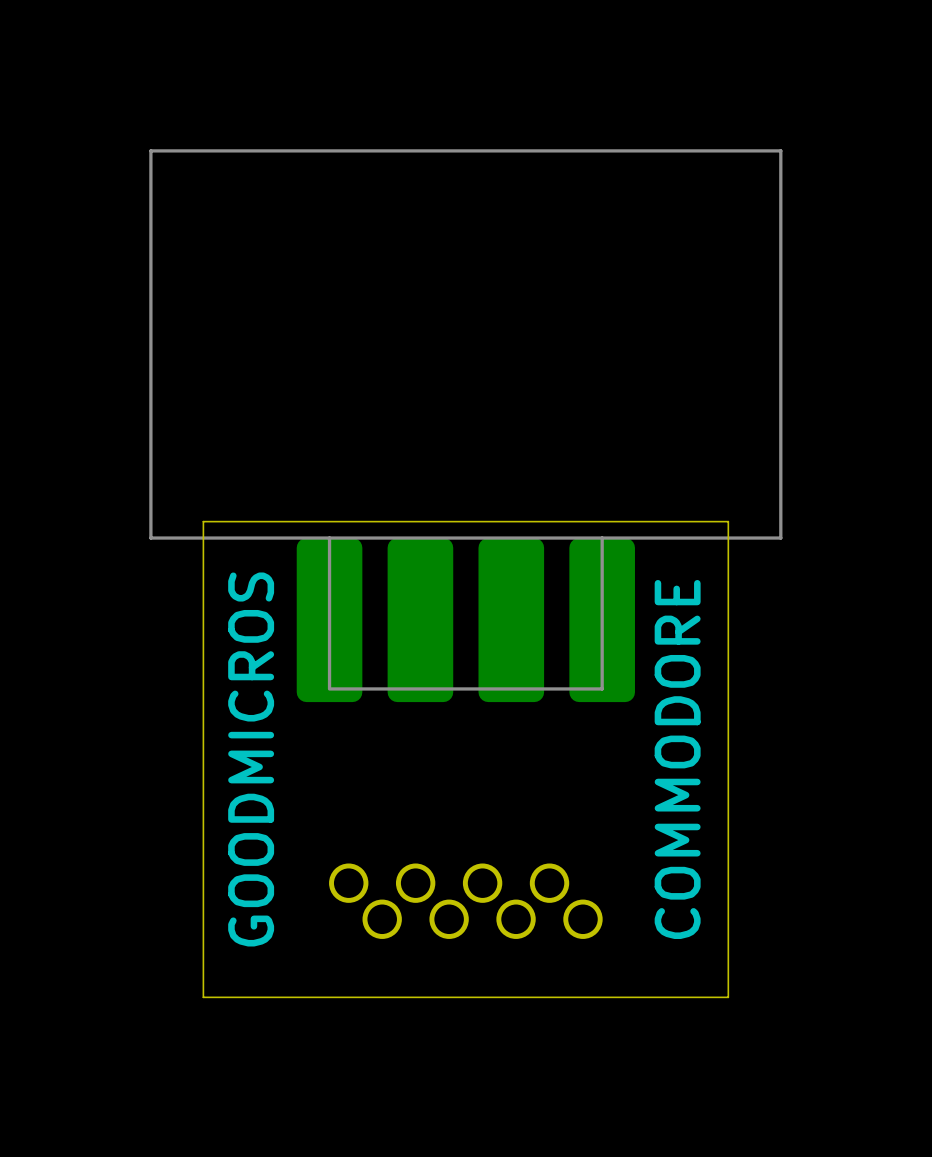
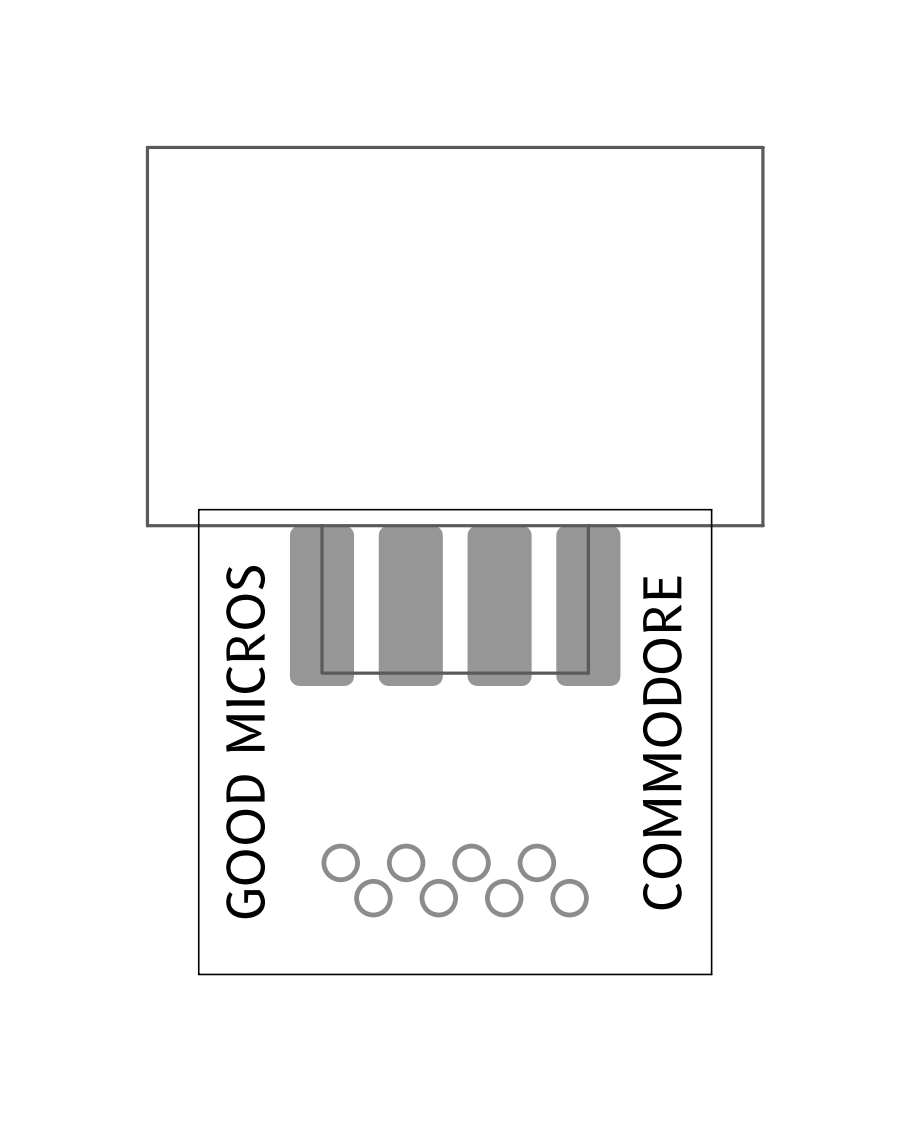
text: GOODMICROS (251, 759) -> GOOD MICROS (245, 742)

